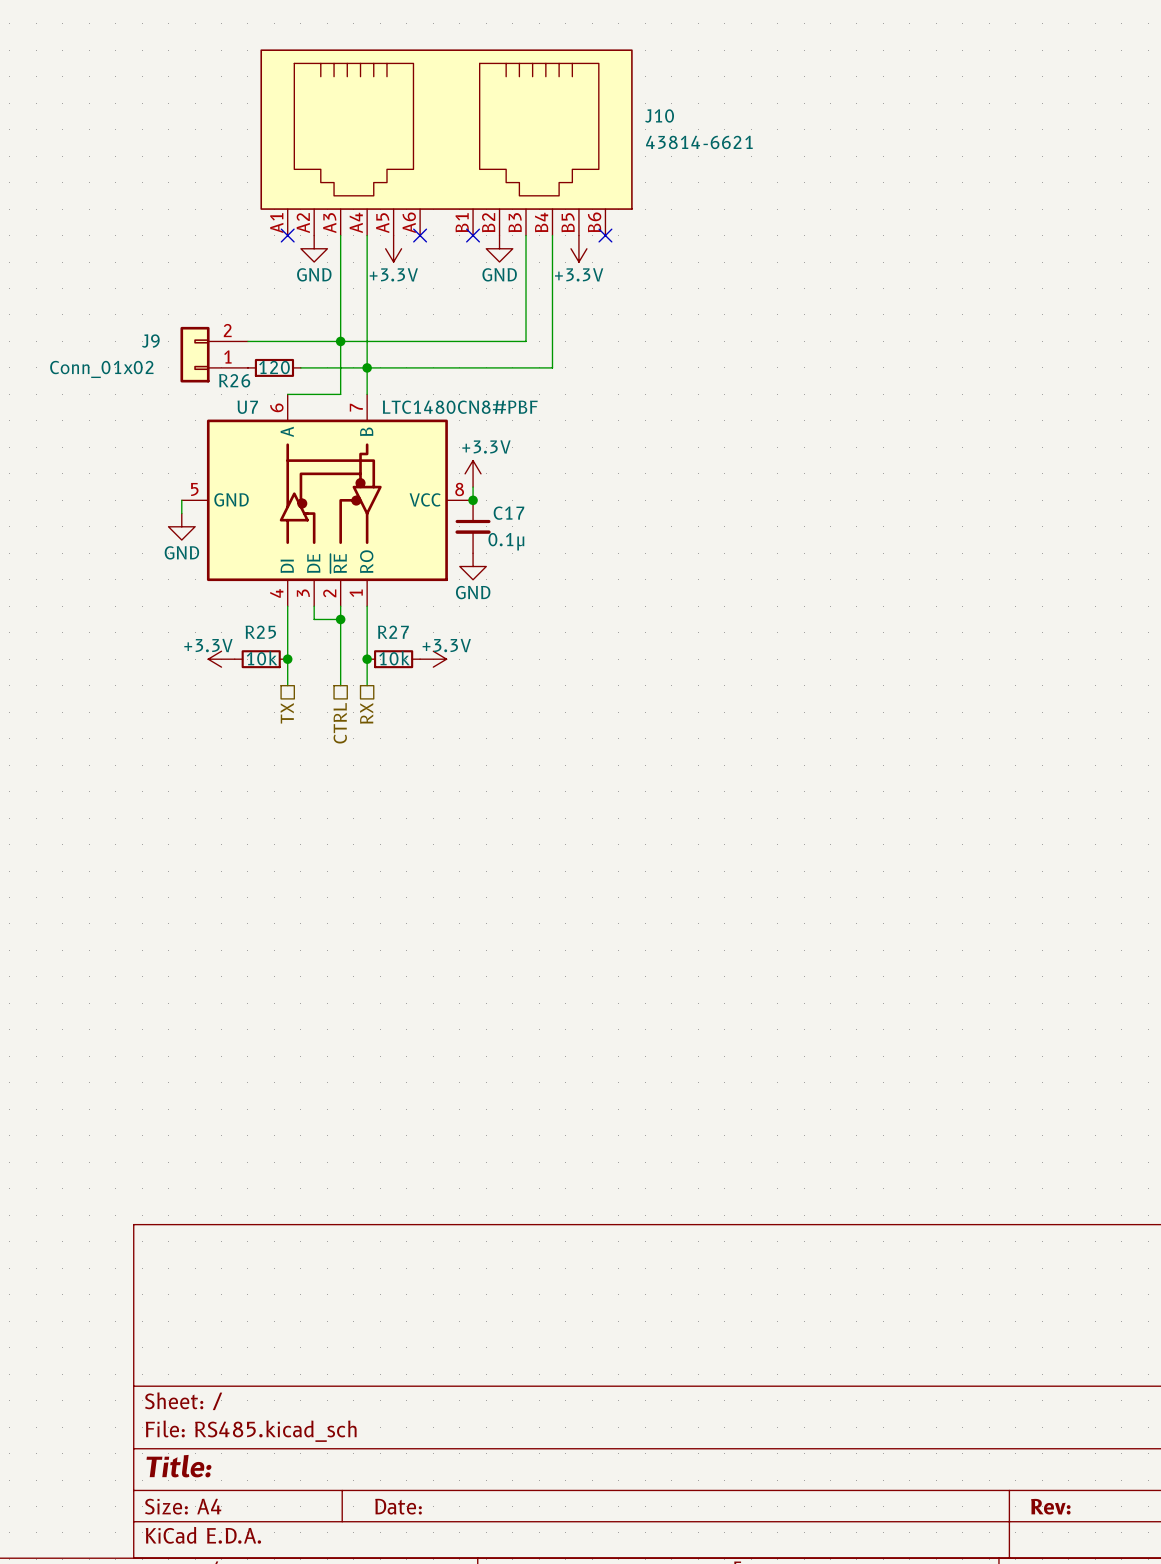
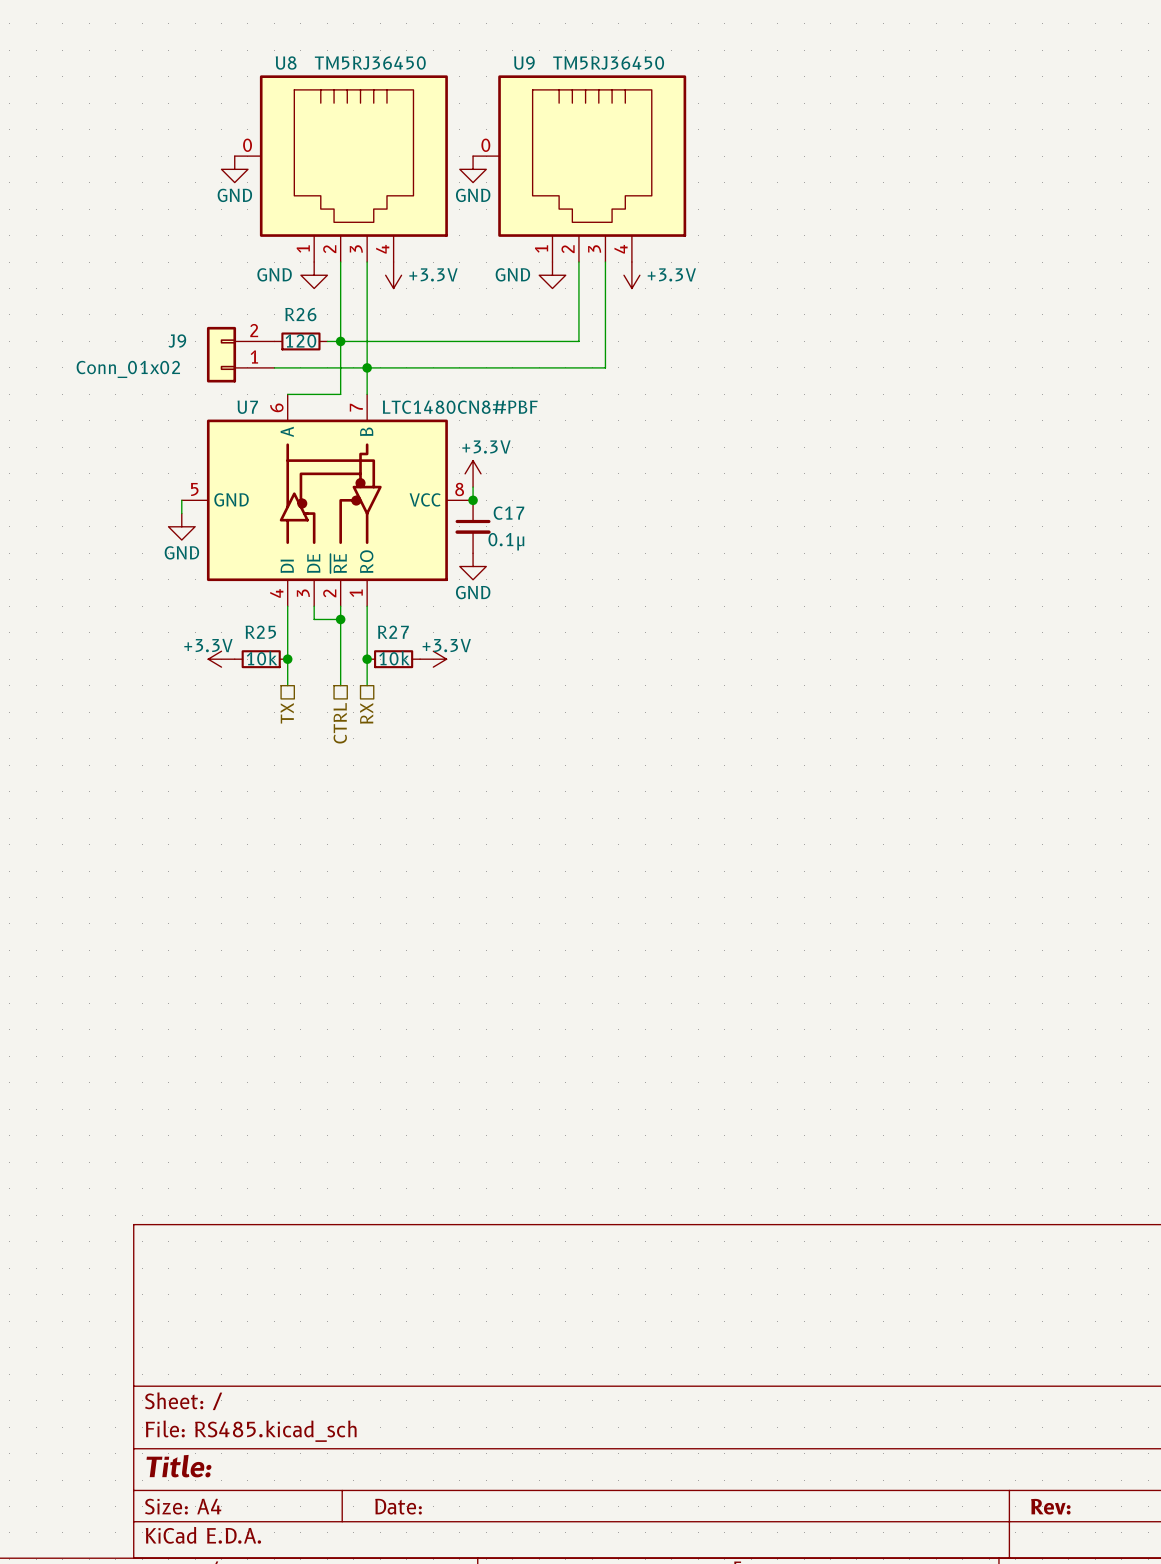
J10: 43814-6621 (446, 142) -> none
U8: none -> TM5RJ36450 (341, 168)
U9: none -> TM5RJ36450 (579, 168)
power symbol: none -> GND (234, 169)
power symbol: none -> GND (473, 169)
no-connect mark: (287, 235) -> none
no-connect mark: (420, 235) -> none
no-connect mark: (473, 235) -> none
wire: (526, 235) (526, 341) -> (578, 262) (578, 341) (526, 341)
wire: (552, 235) (552, 367) -> (605, 262) (605, 367) (552, 367)
no-connect mark: (605, 235) -> none
power symbol position: GND (314, 248) -> GND (314, 275)
power symbol position: +3.3V (393, 248) -> +3.3V (393, 275)
power symbol: GND (499, 248) -> none
power symbol position: +3.3V (578, 248) -> +3.3V (631, 275)
power symbol text position: GND (314, 274) -> GND (274, 274)
power symbol text position: +3.3V (393, 274) -> +3.3V (433, 274)
power symbol text position: +3.3V (579, 274) -> +3.3V (671, 274)
power symbol: none -> GND (552, 275)
J9 position: (214, 354) -> (240, 354)
R26 position: (274, 367) -> (300, 341)
R26 name position: R26 (234, 380) -> R26 (300, 314)

